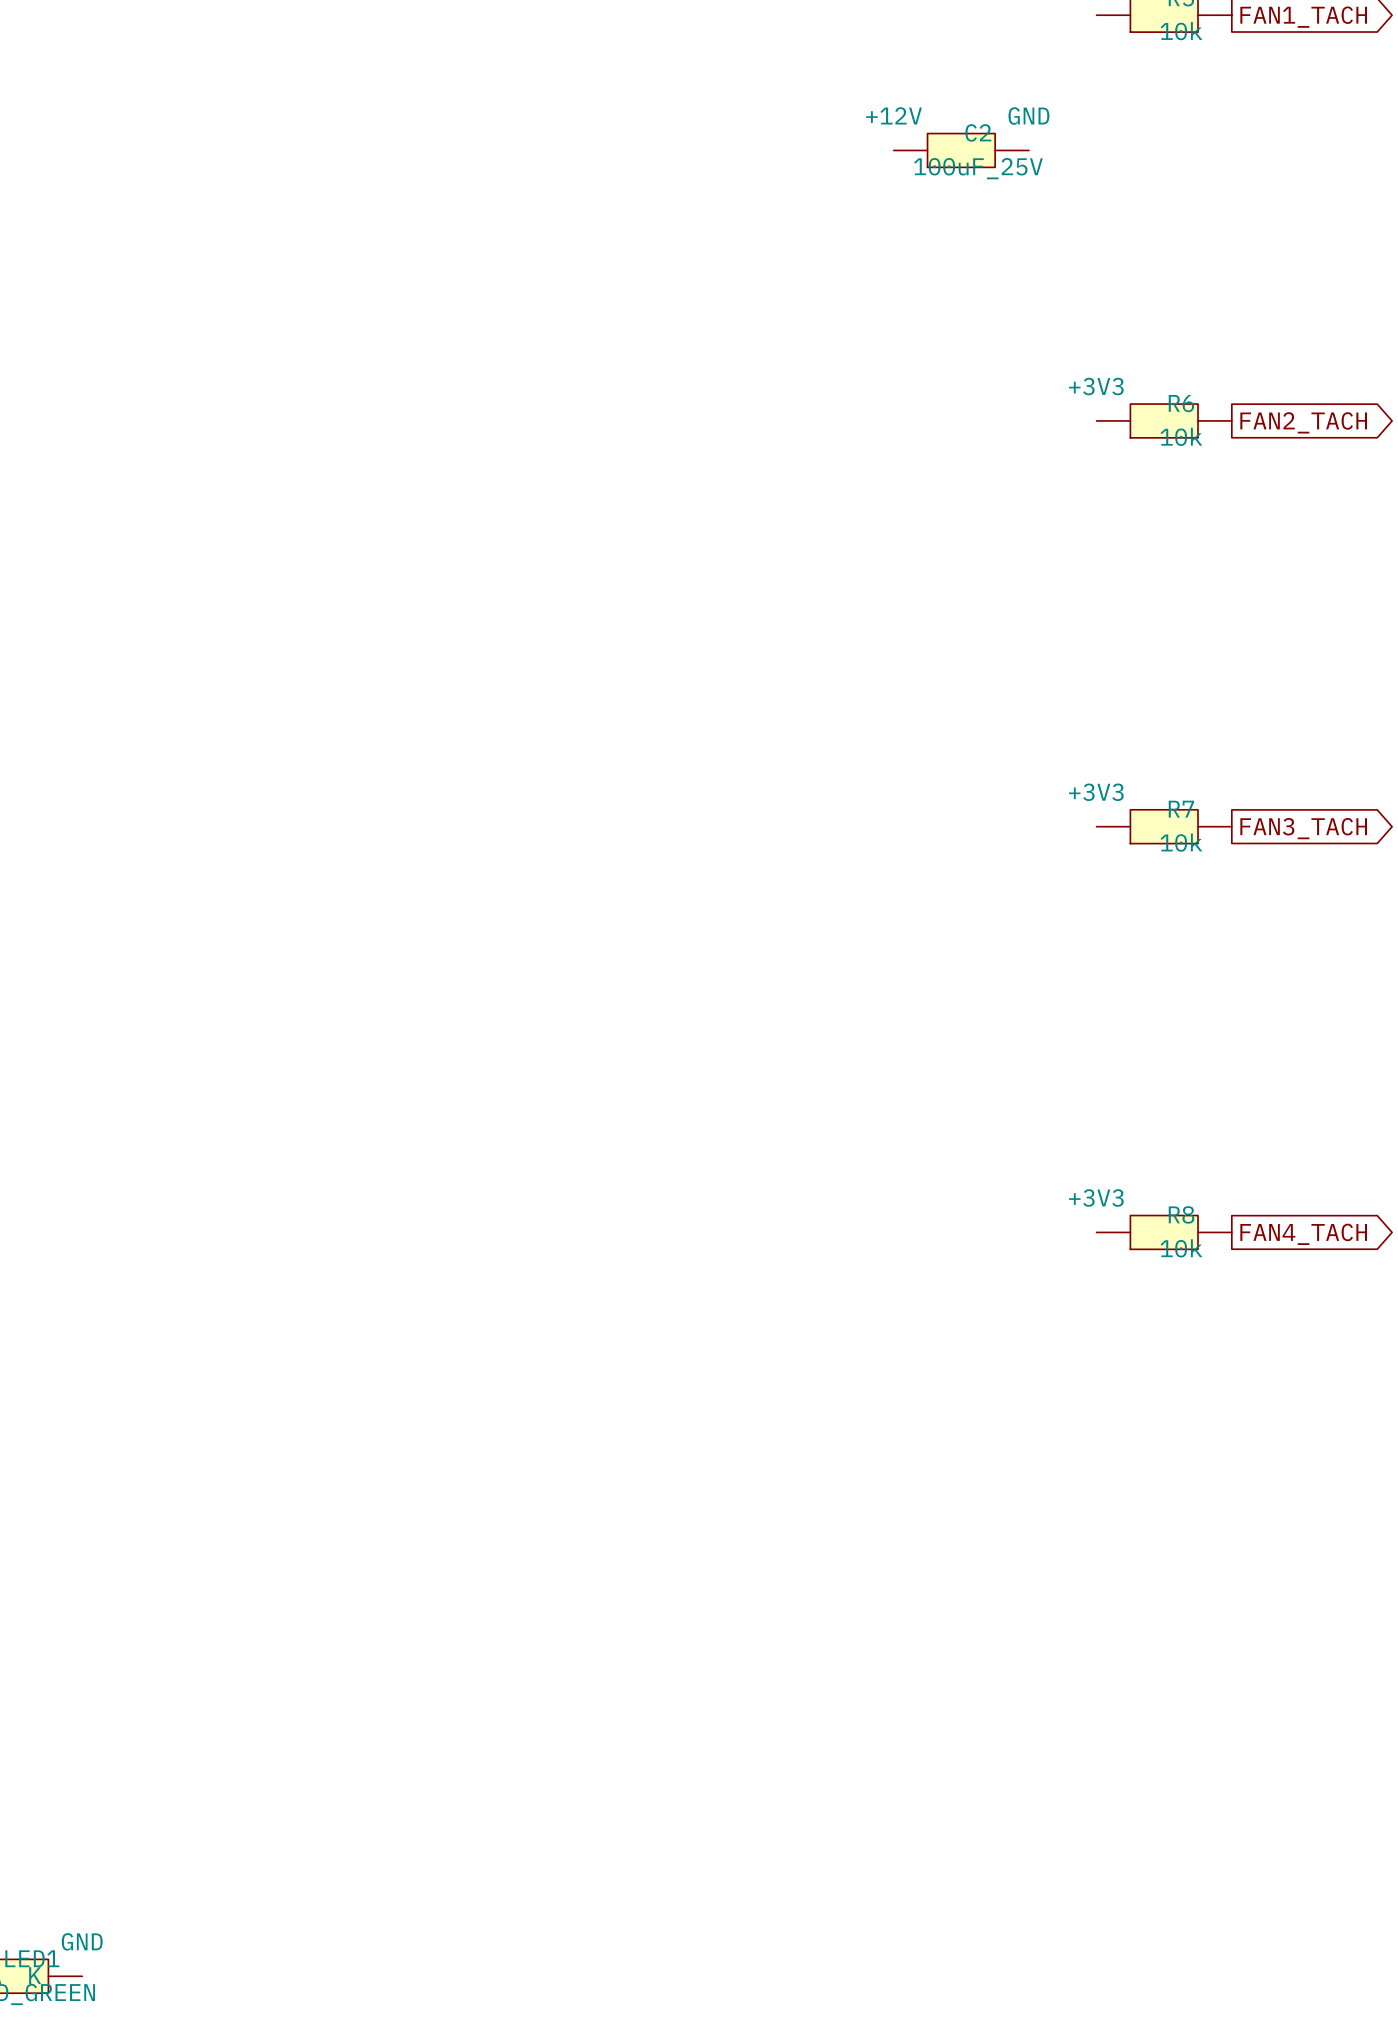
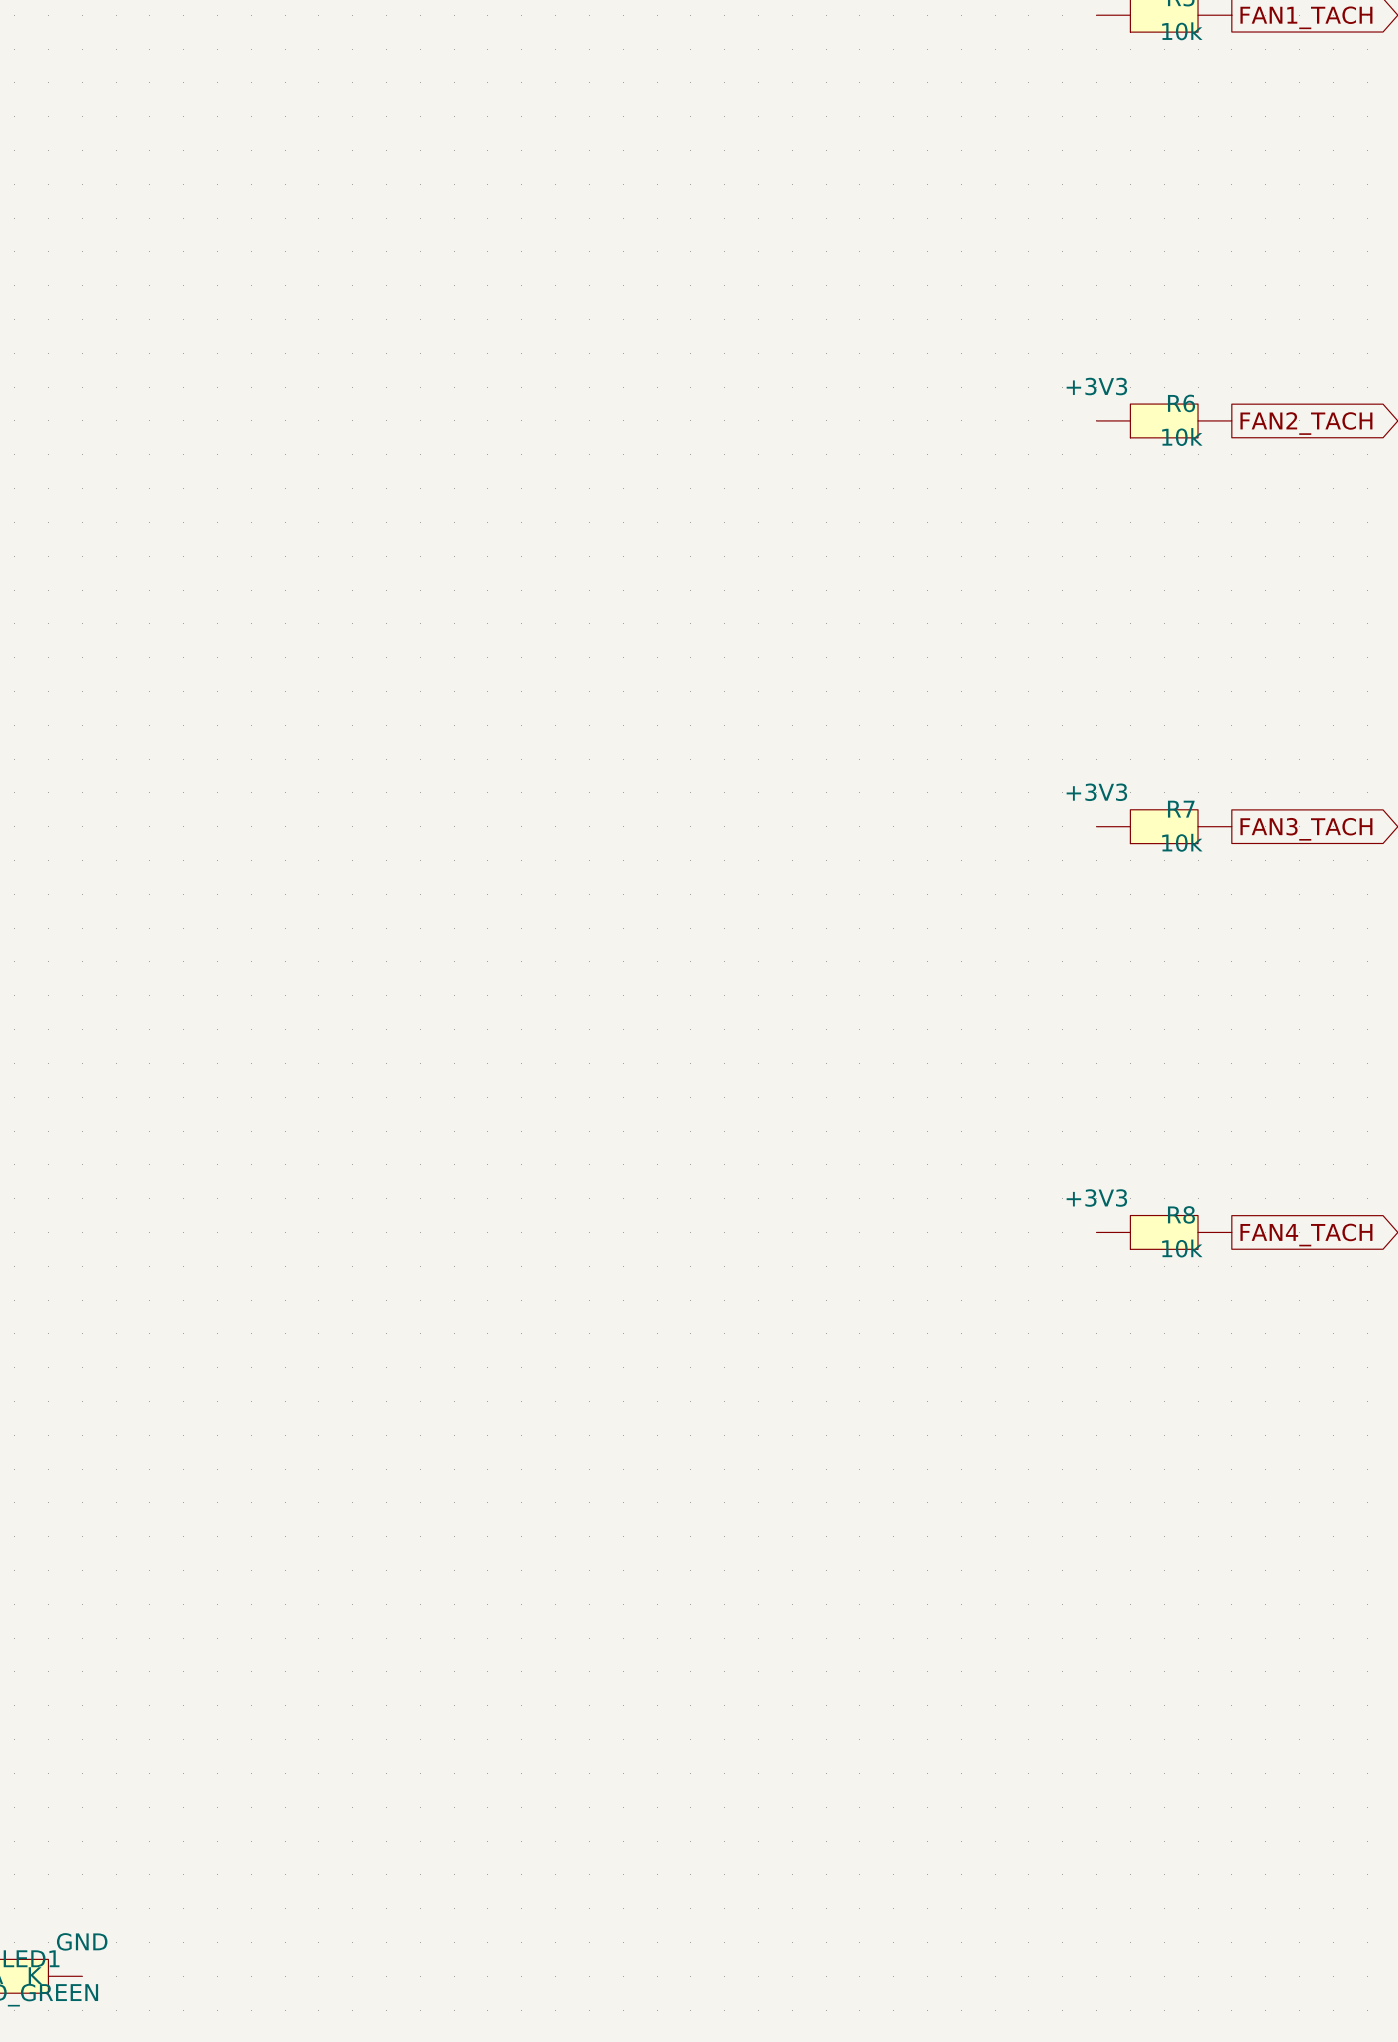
power symbol: +12V (894, 115) -> none
power symbol: GND (1028, 116) -> none
C2: 100uF_25V (961, 150) -> none

